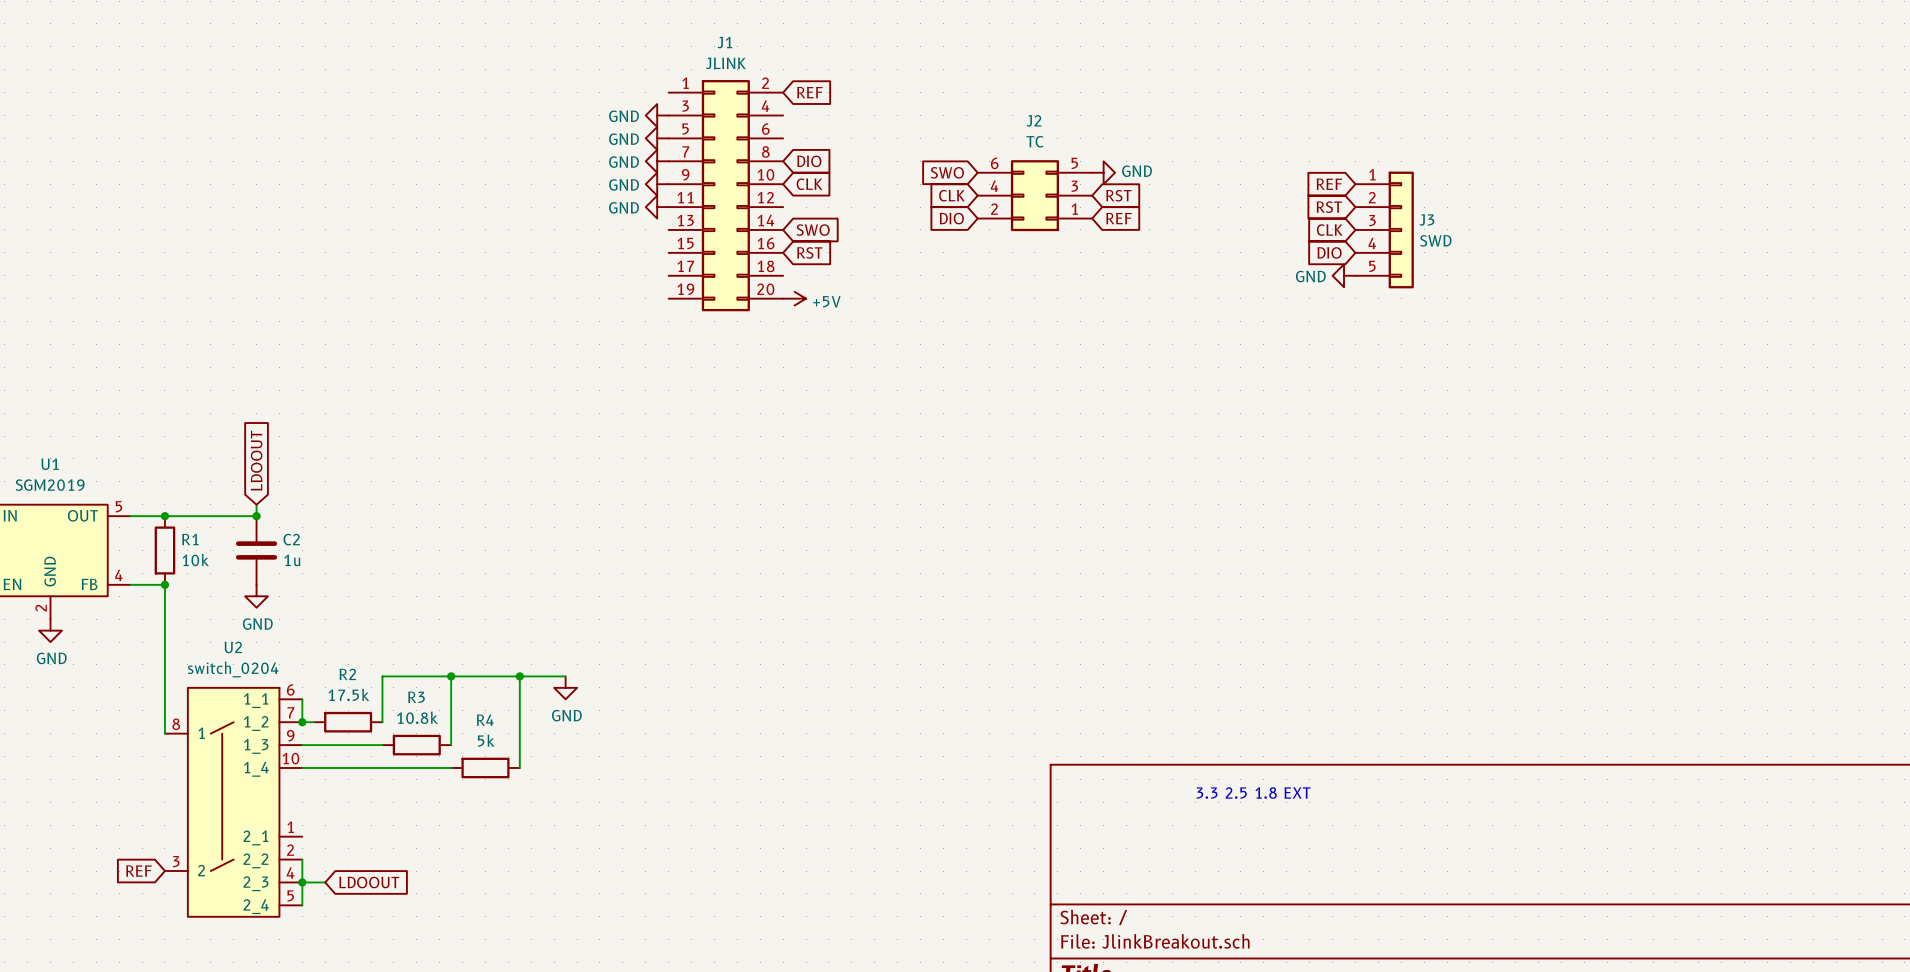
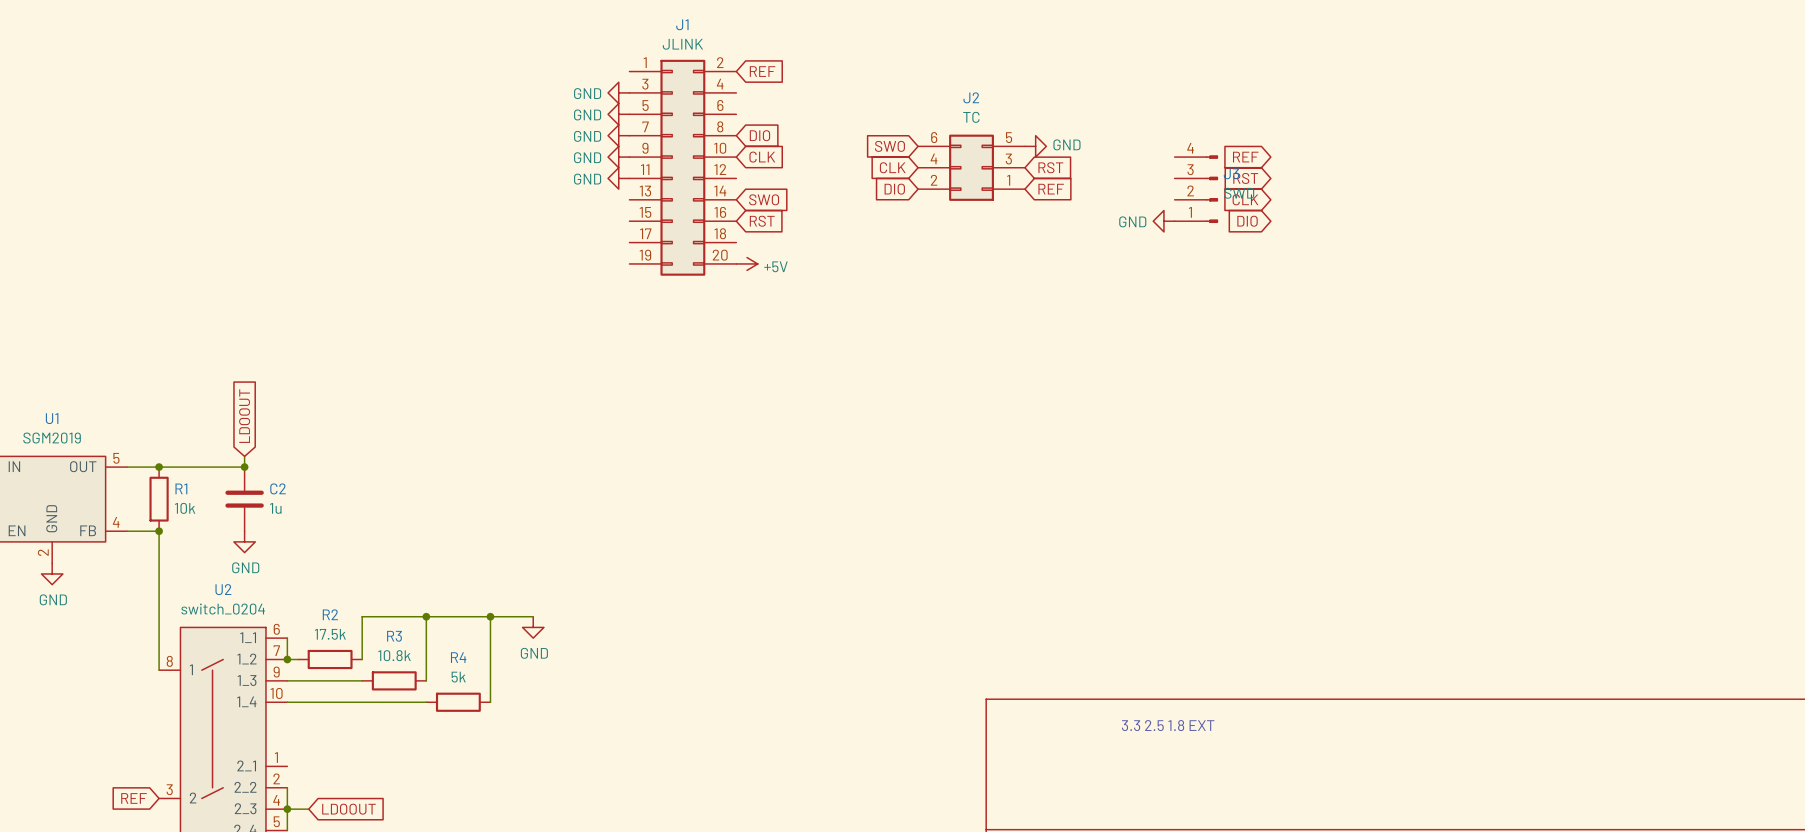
J3 symbol: [1355, 171, 1414, 289] -> [1174, 155, 1219, 223]
power symbol position: GND (1344, 275) -> GND (1163, 221)

